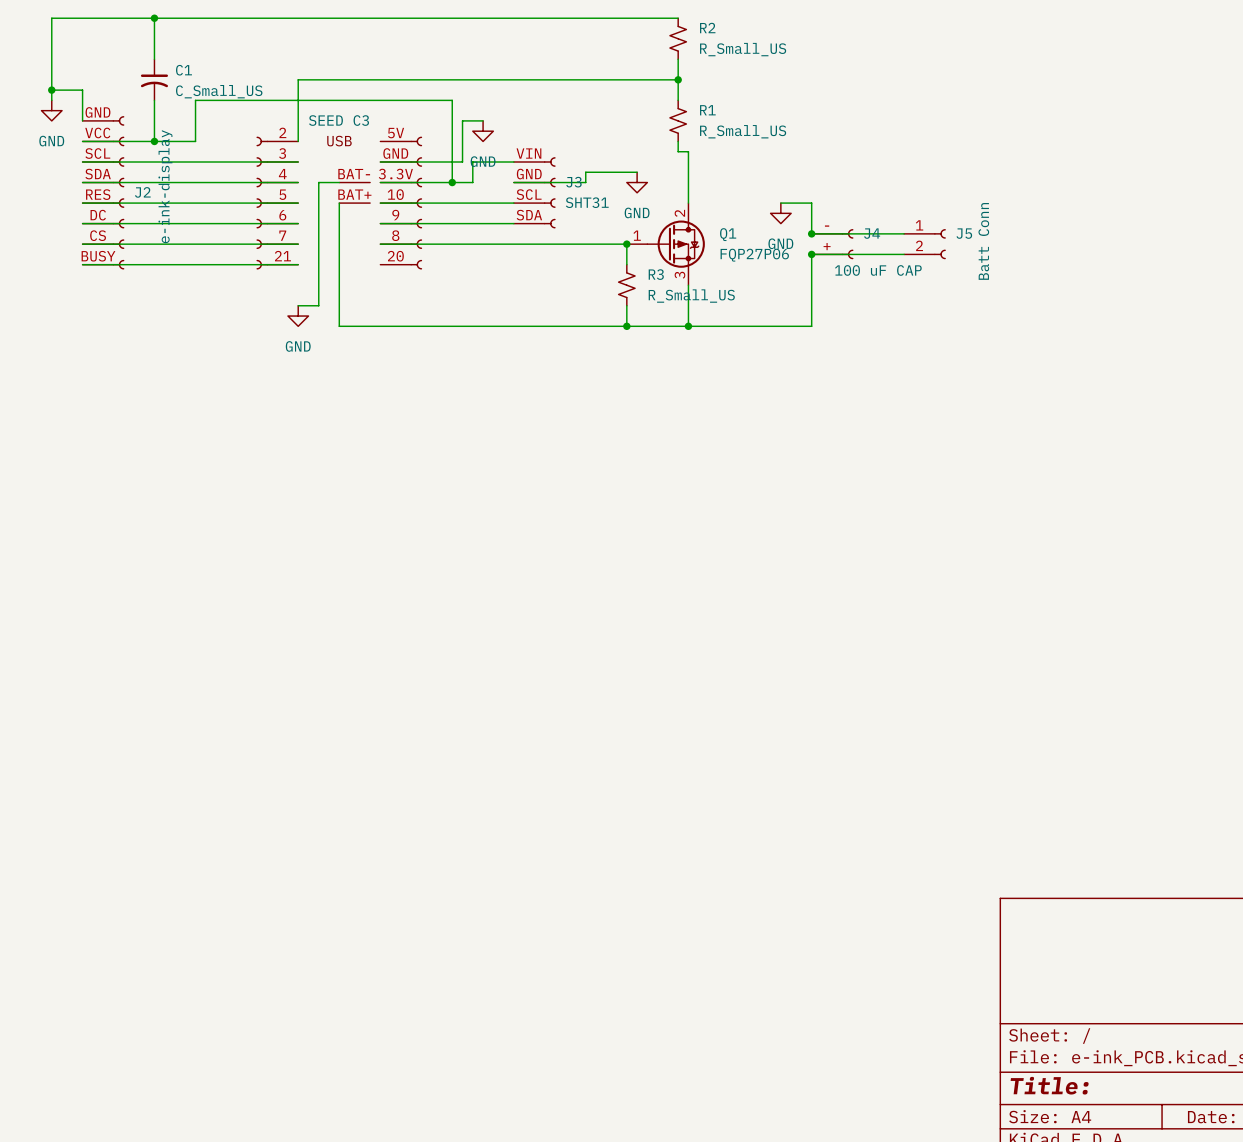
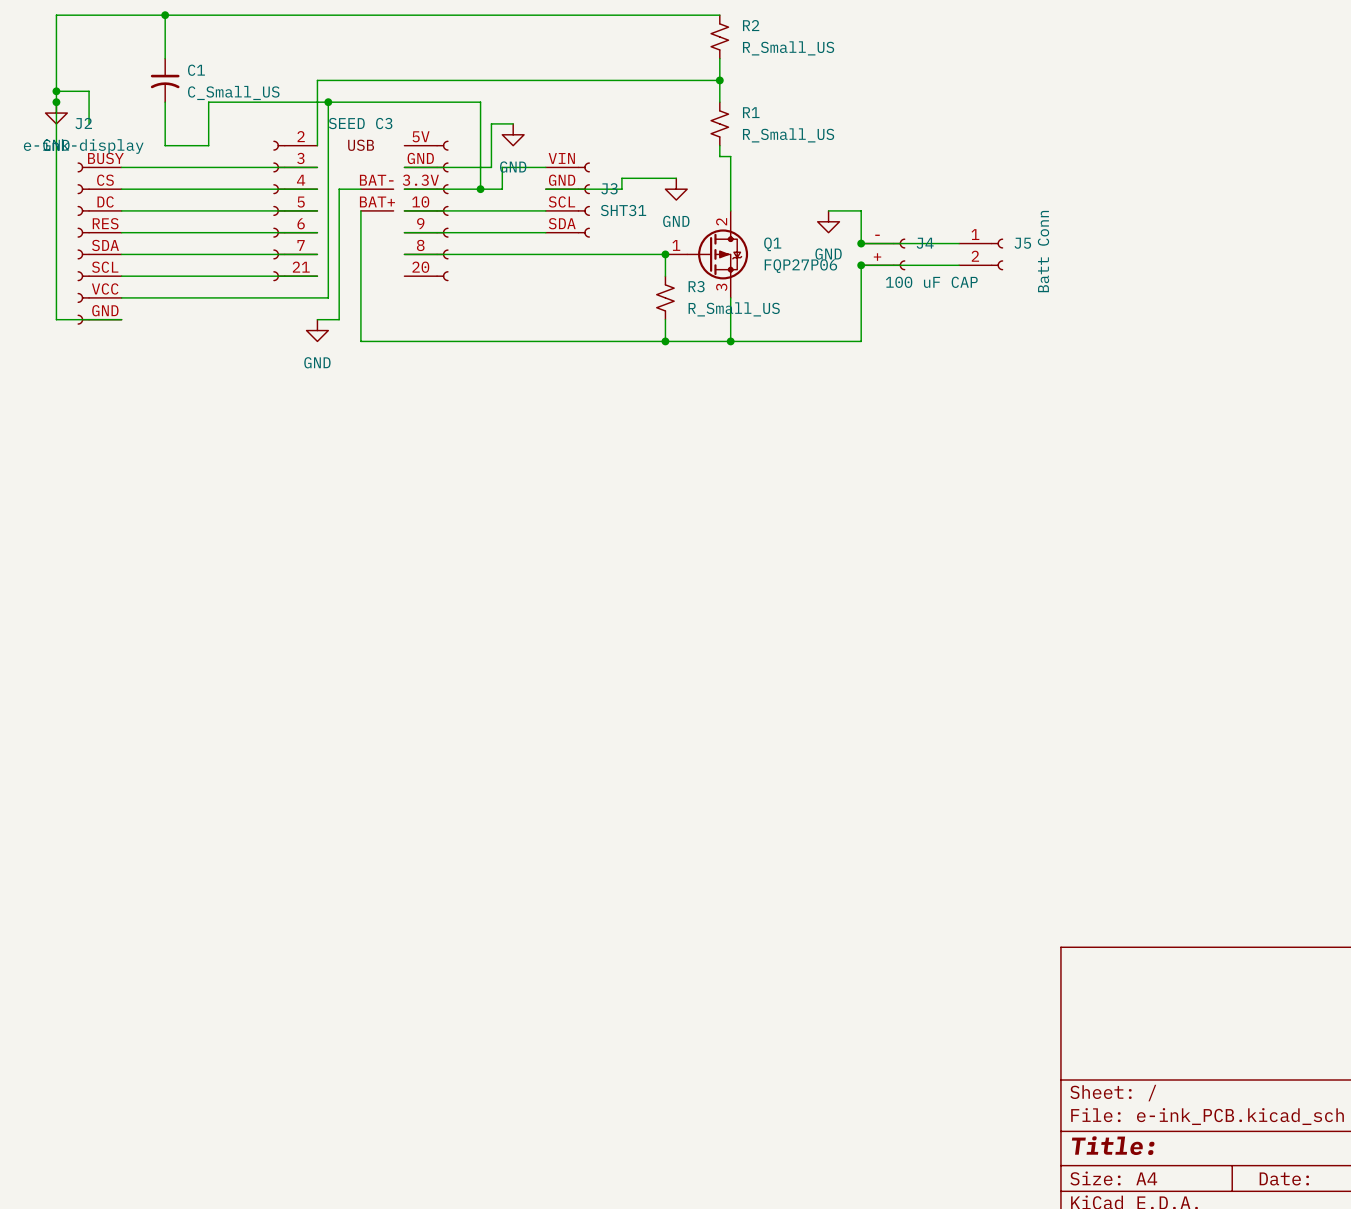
wire: none -> (56, 102) (56, 319) (121, 319)
junction: none -> (56, 102)
wire: none -> (328, 102) (328, 297) (121, 297)
junction: none -> (328, 102)
wire: (82, 141) (154, 141) -> none
junction: (154, 141) -> none
J2 value position: e-ink-display (165, 186) -> e-ink-display (83, 146)
J2 rotation: 0° (118, 192) -> 180° (83, 243)
J2 name position: J2 (142, 192) -> J2 (83, 123)

